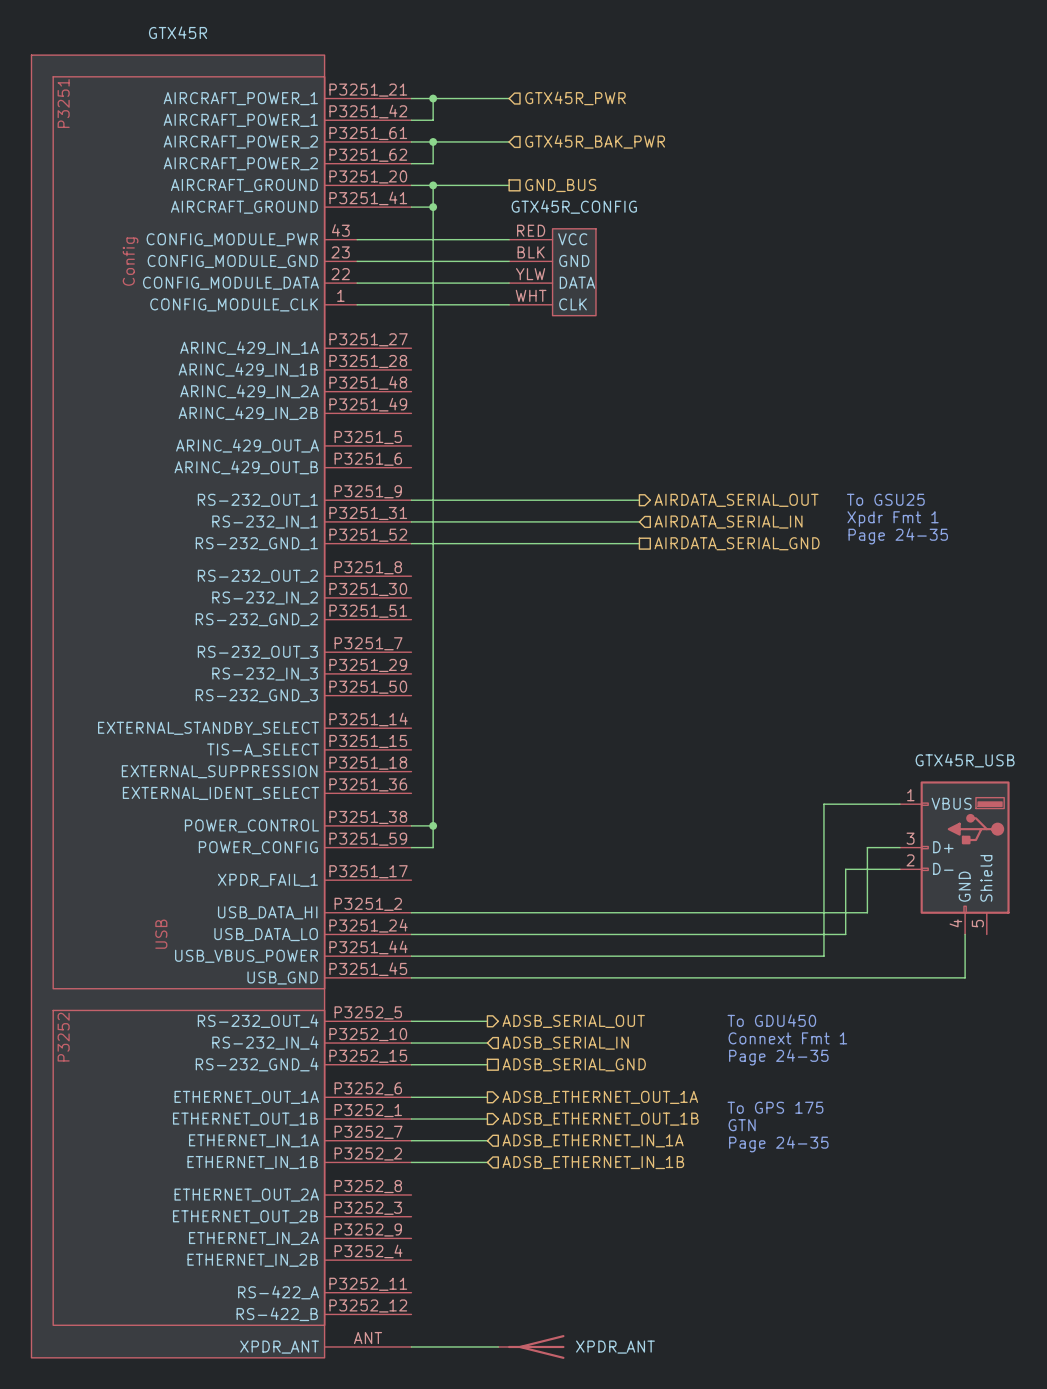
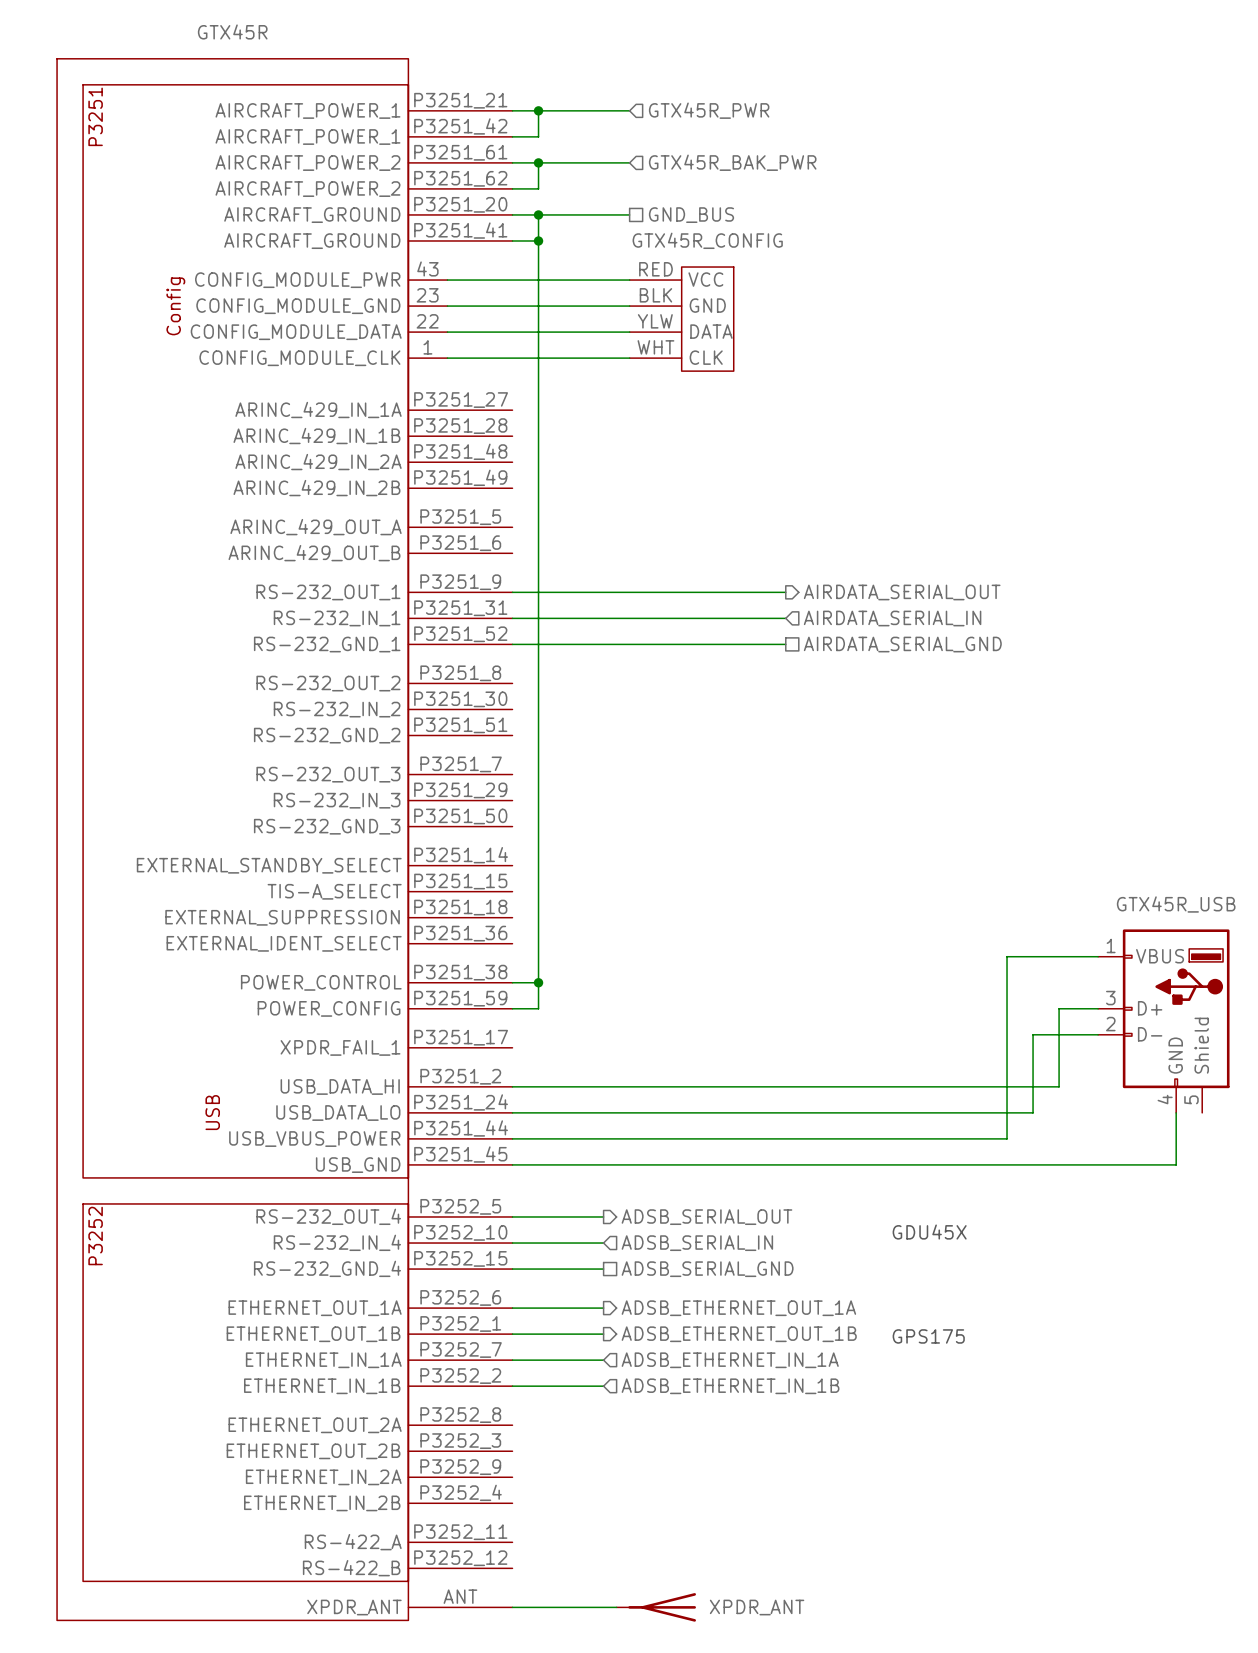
text: To GSU25 (885, 499) -> none
text: Xpdr Fmt 1 (893, 519) -> none
text: Page 24-35 (898, 536) -> none
text: To GDU450 (771, 1020) -> none
text: Connext Fmt 1 (787, 1038) -> GDU45X (929, 1232)
text: Page 24-35 (778, 1057) -> none
text: To GPS 175 (775, 1107) -> none
text: GTN (742, 1125) -> GPS175 (928, 1336)
text: Page 24-35 (778, 1144) -> none

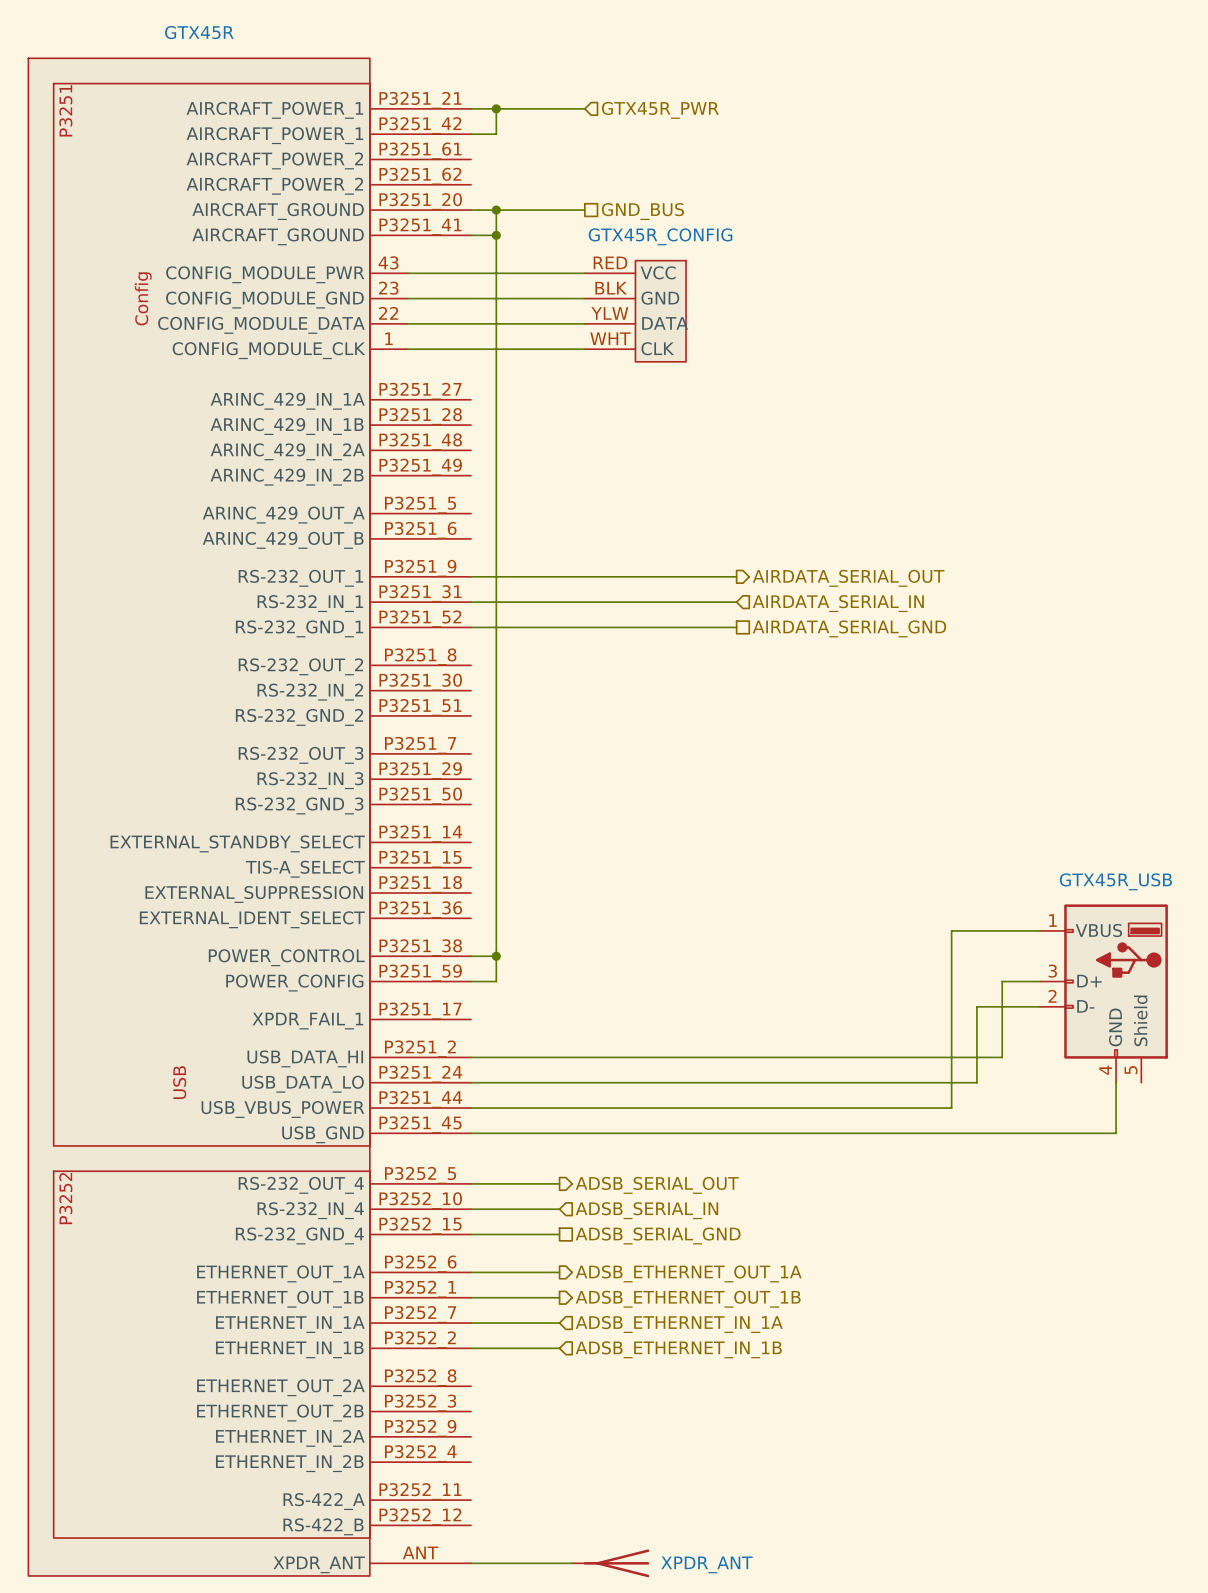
wire: (512, 162) (629, 162) -> none
wire: (538, 162) (538, 188) (512, 188) -> none
junction: (538, 162) -> none
hierarchical label: GTX45R_BAK_PWR (732, 162) -> none
text: GDU45X (929, 1232) -> none
text: GPS175 (928, 1336) -> none

